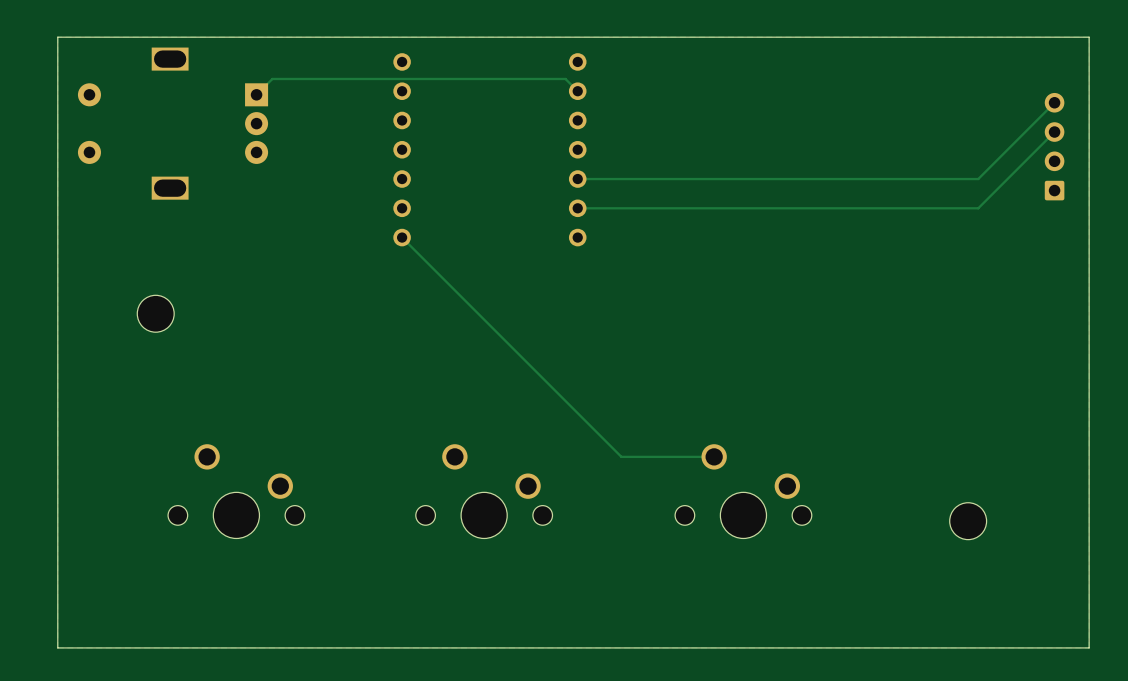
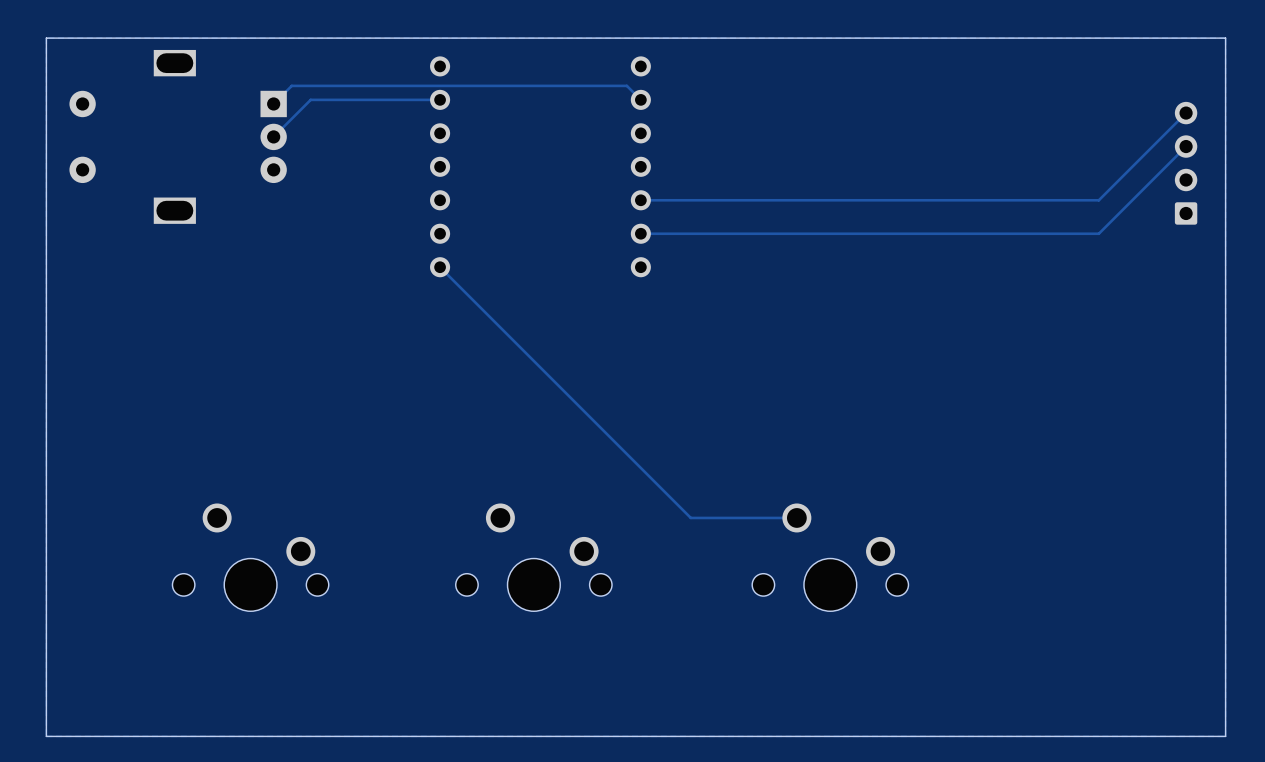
track: none -> (440, 99) (310, 99) (273, 136)
part: (155, 313) -> none
part: (968, 521) -> none

